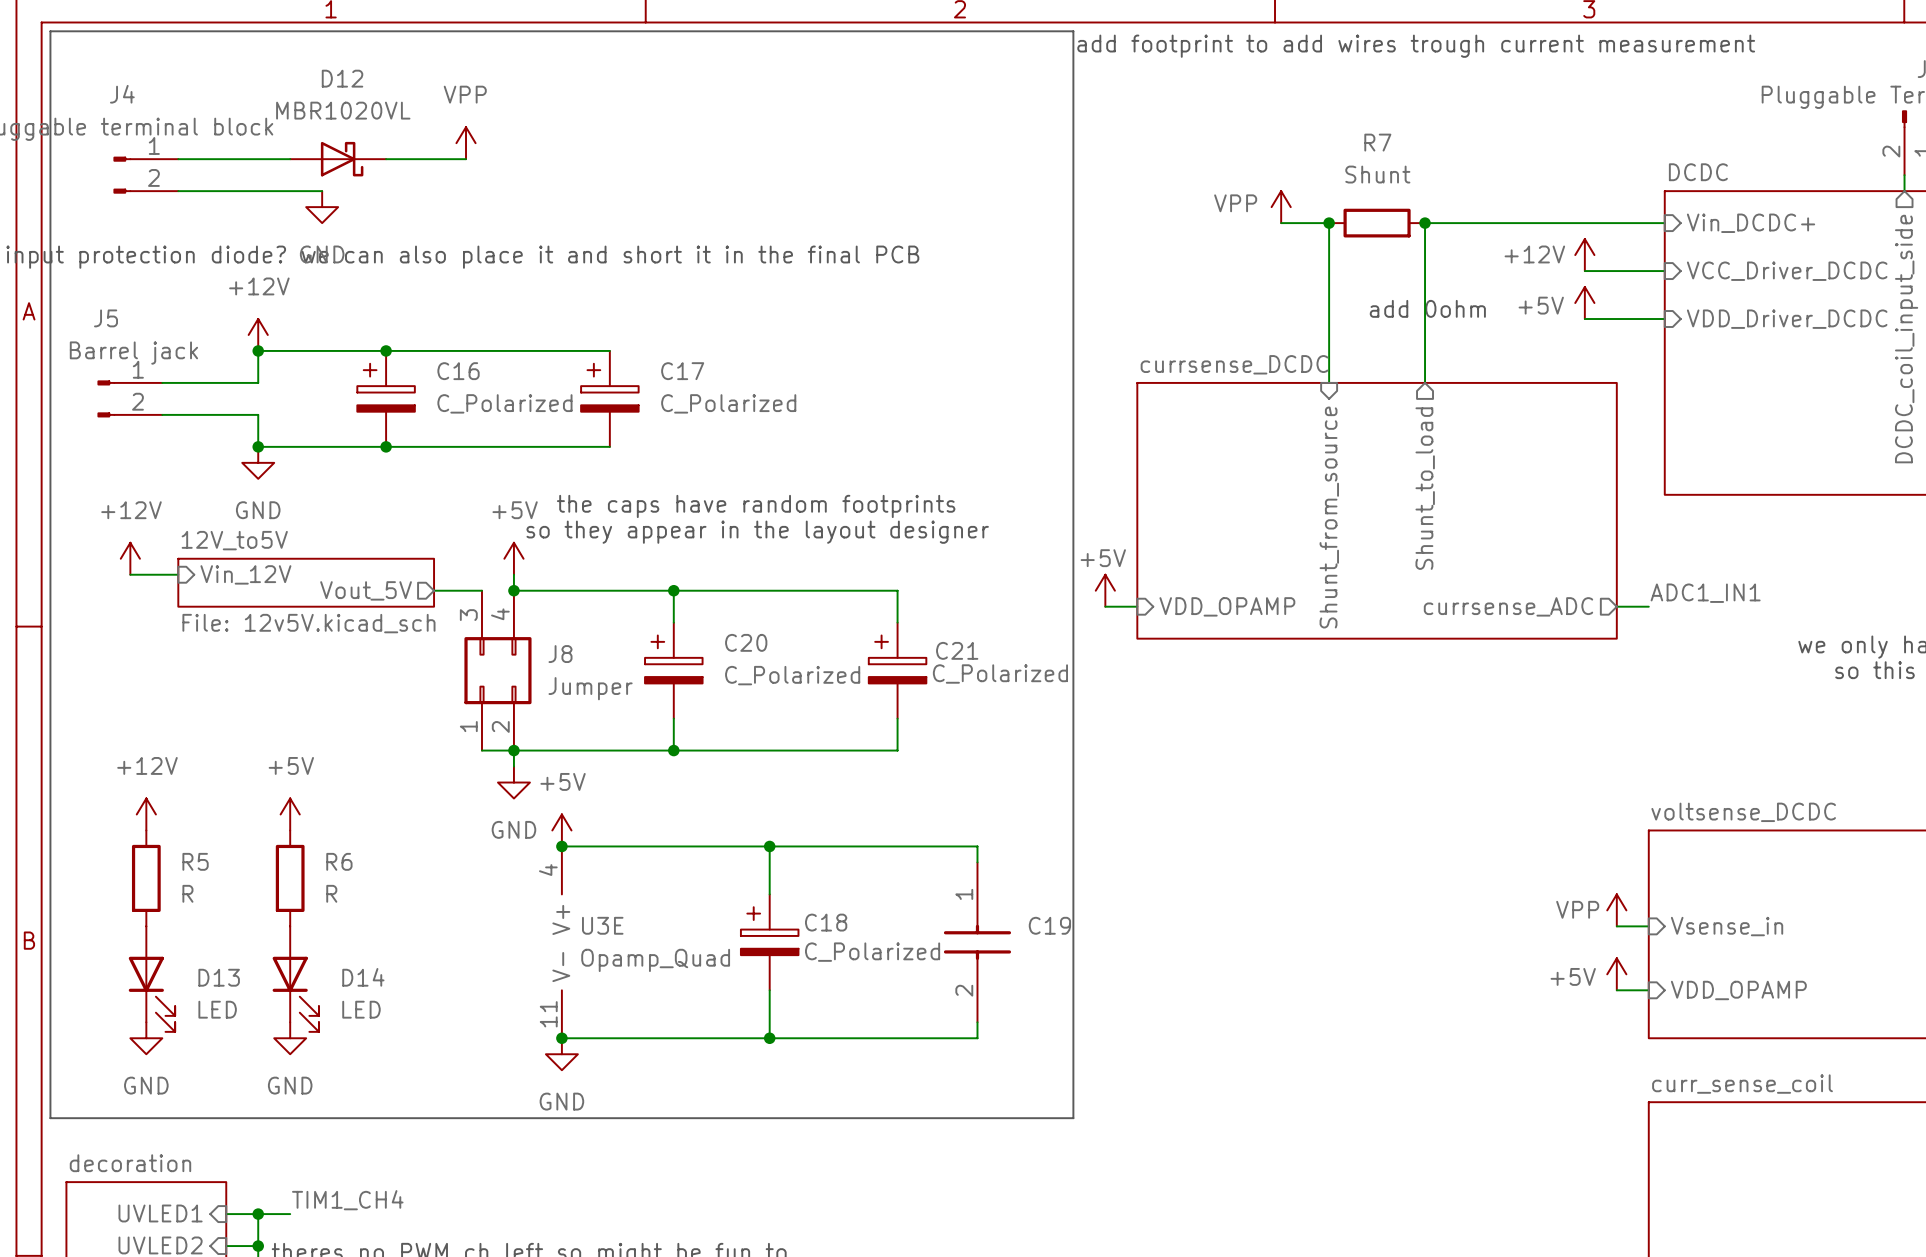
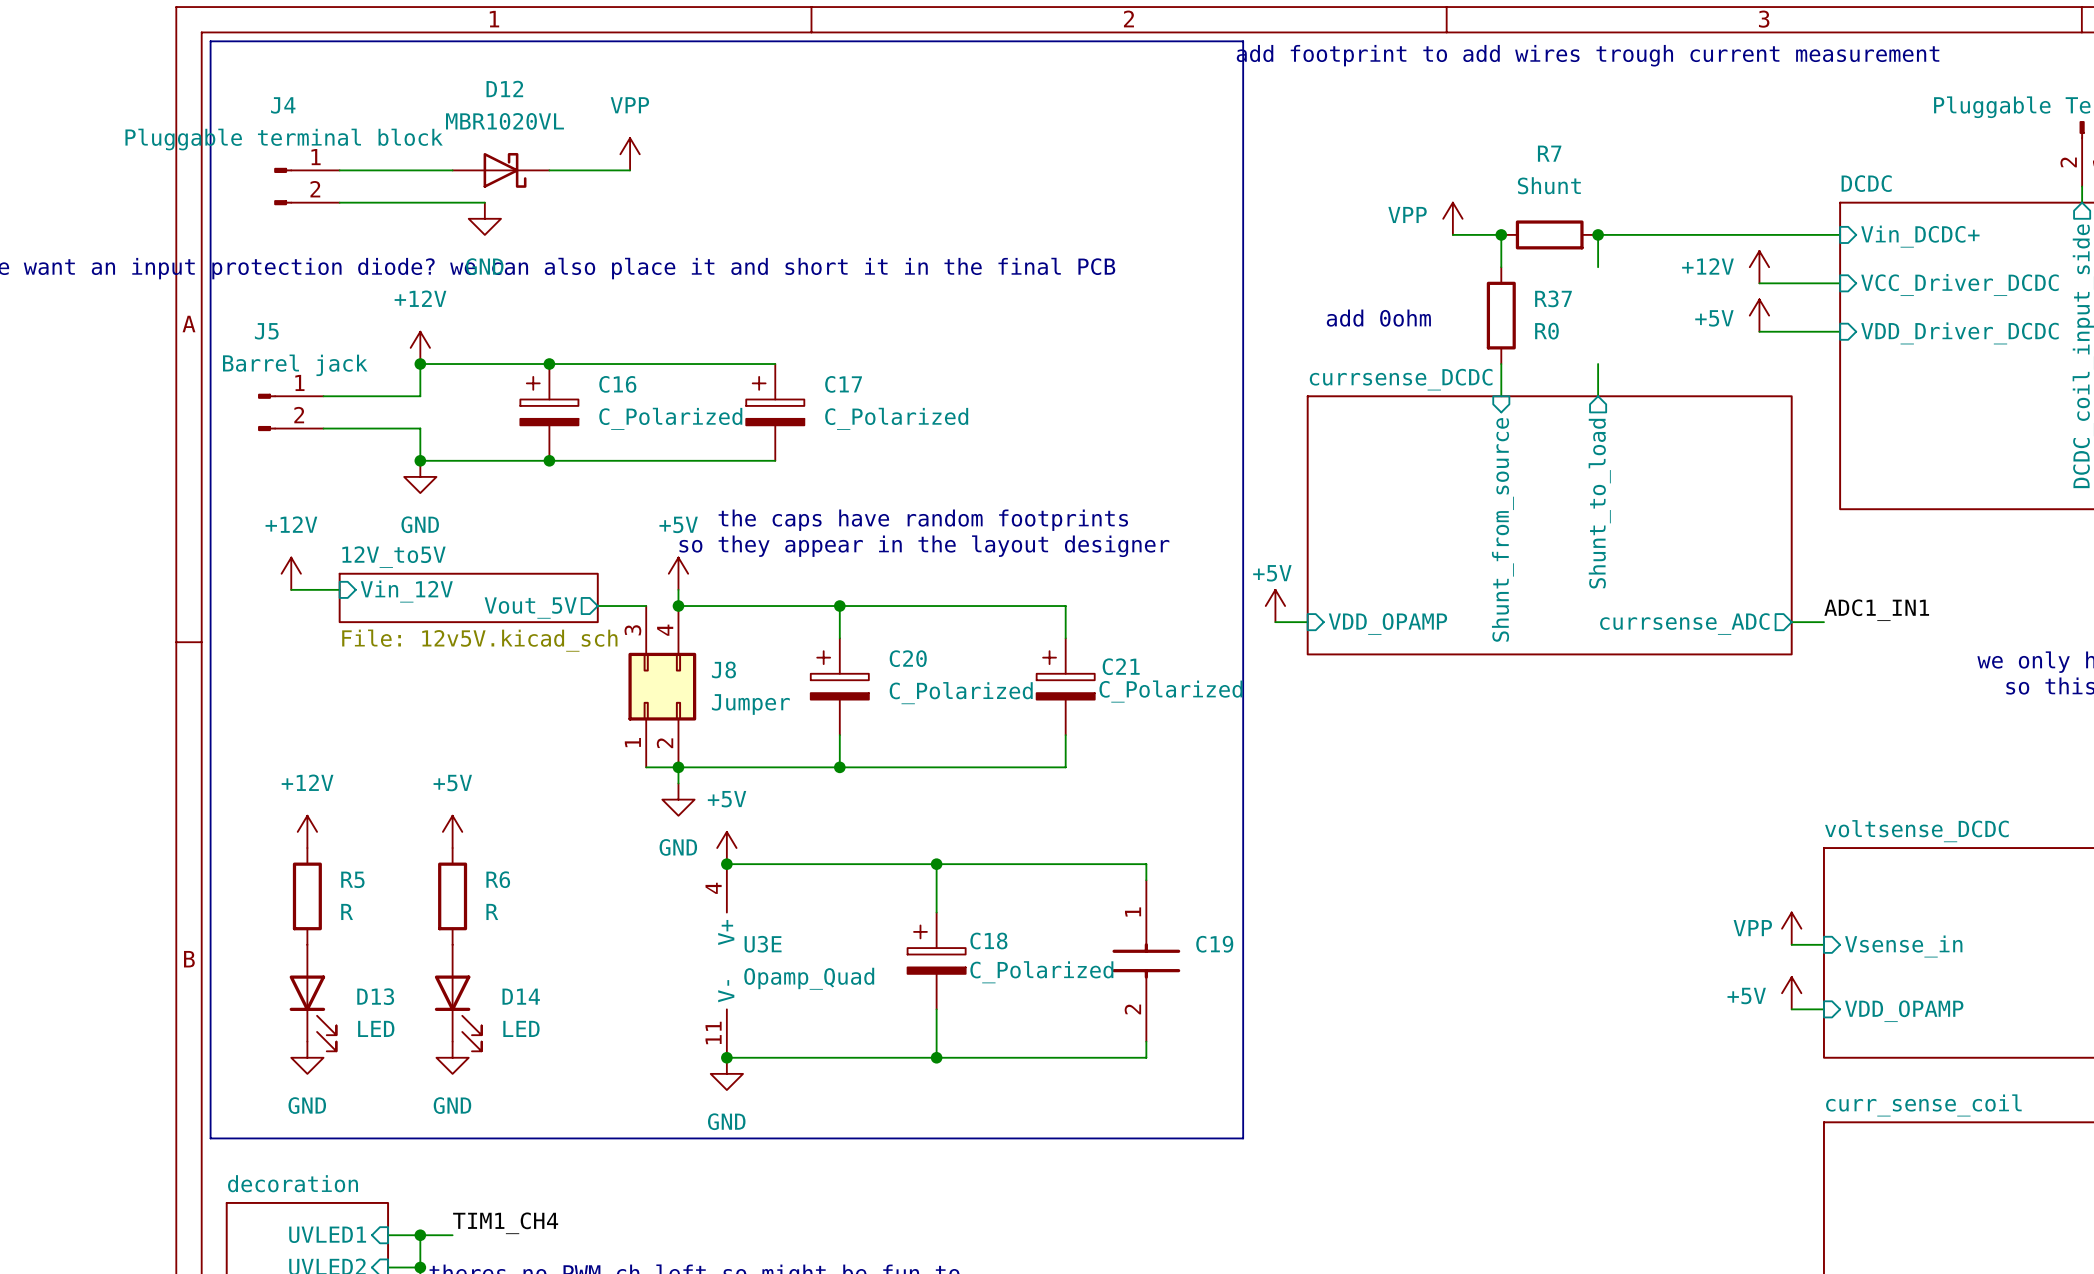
wire: (1329, 255) (1329, 350) -> none
wire: (1425, 255) (1425, 350) -> none
R37: none -> R0 (1501, 315)
text position: add 0ohm (1427, 308) -> add 0ohm (1378, 318)

